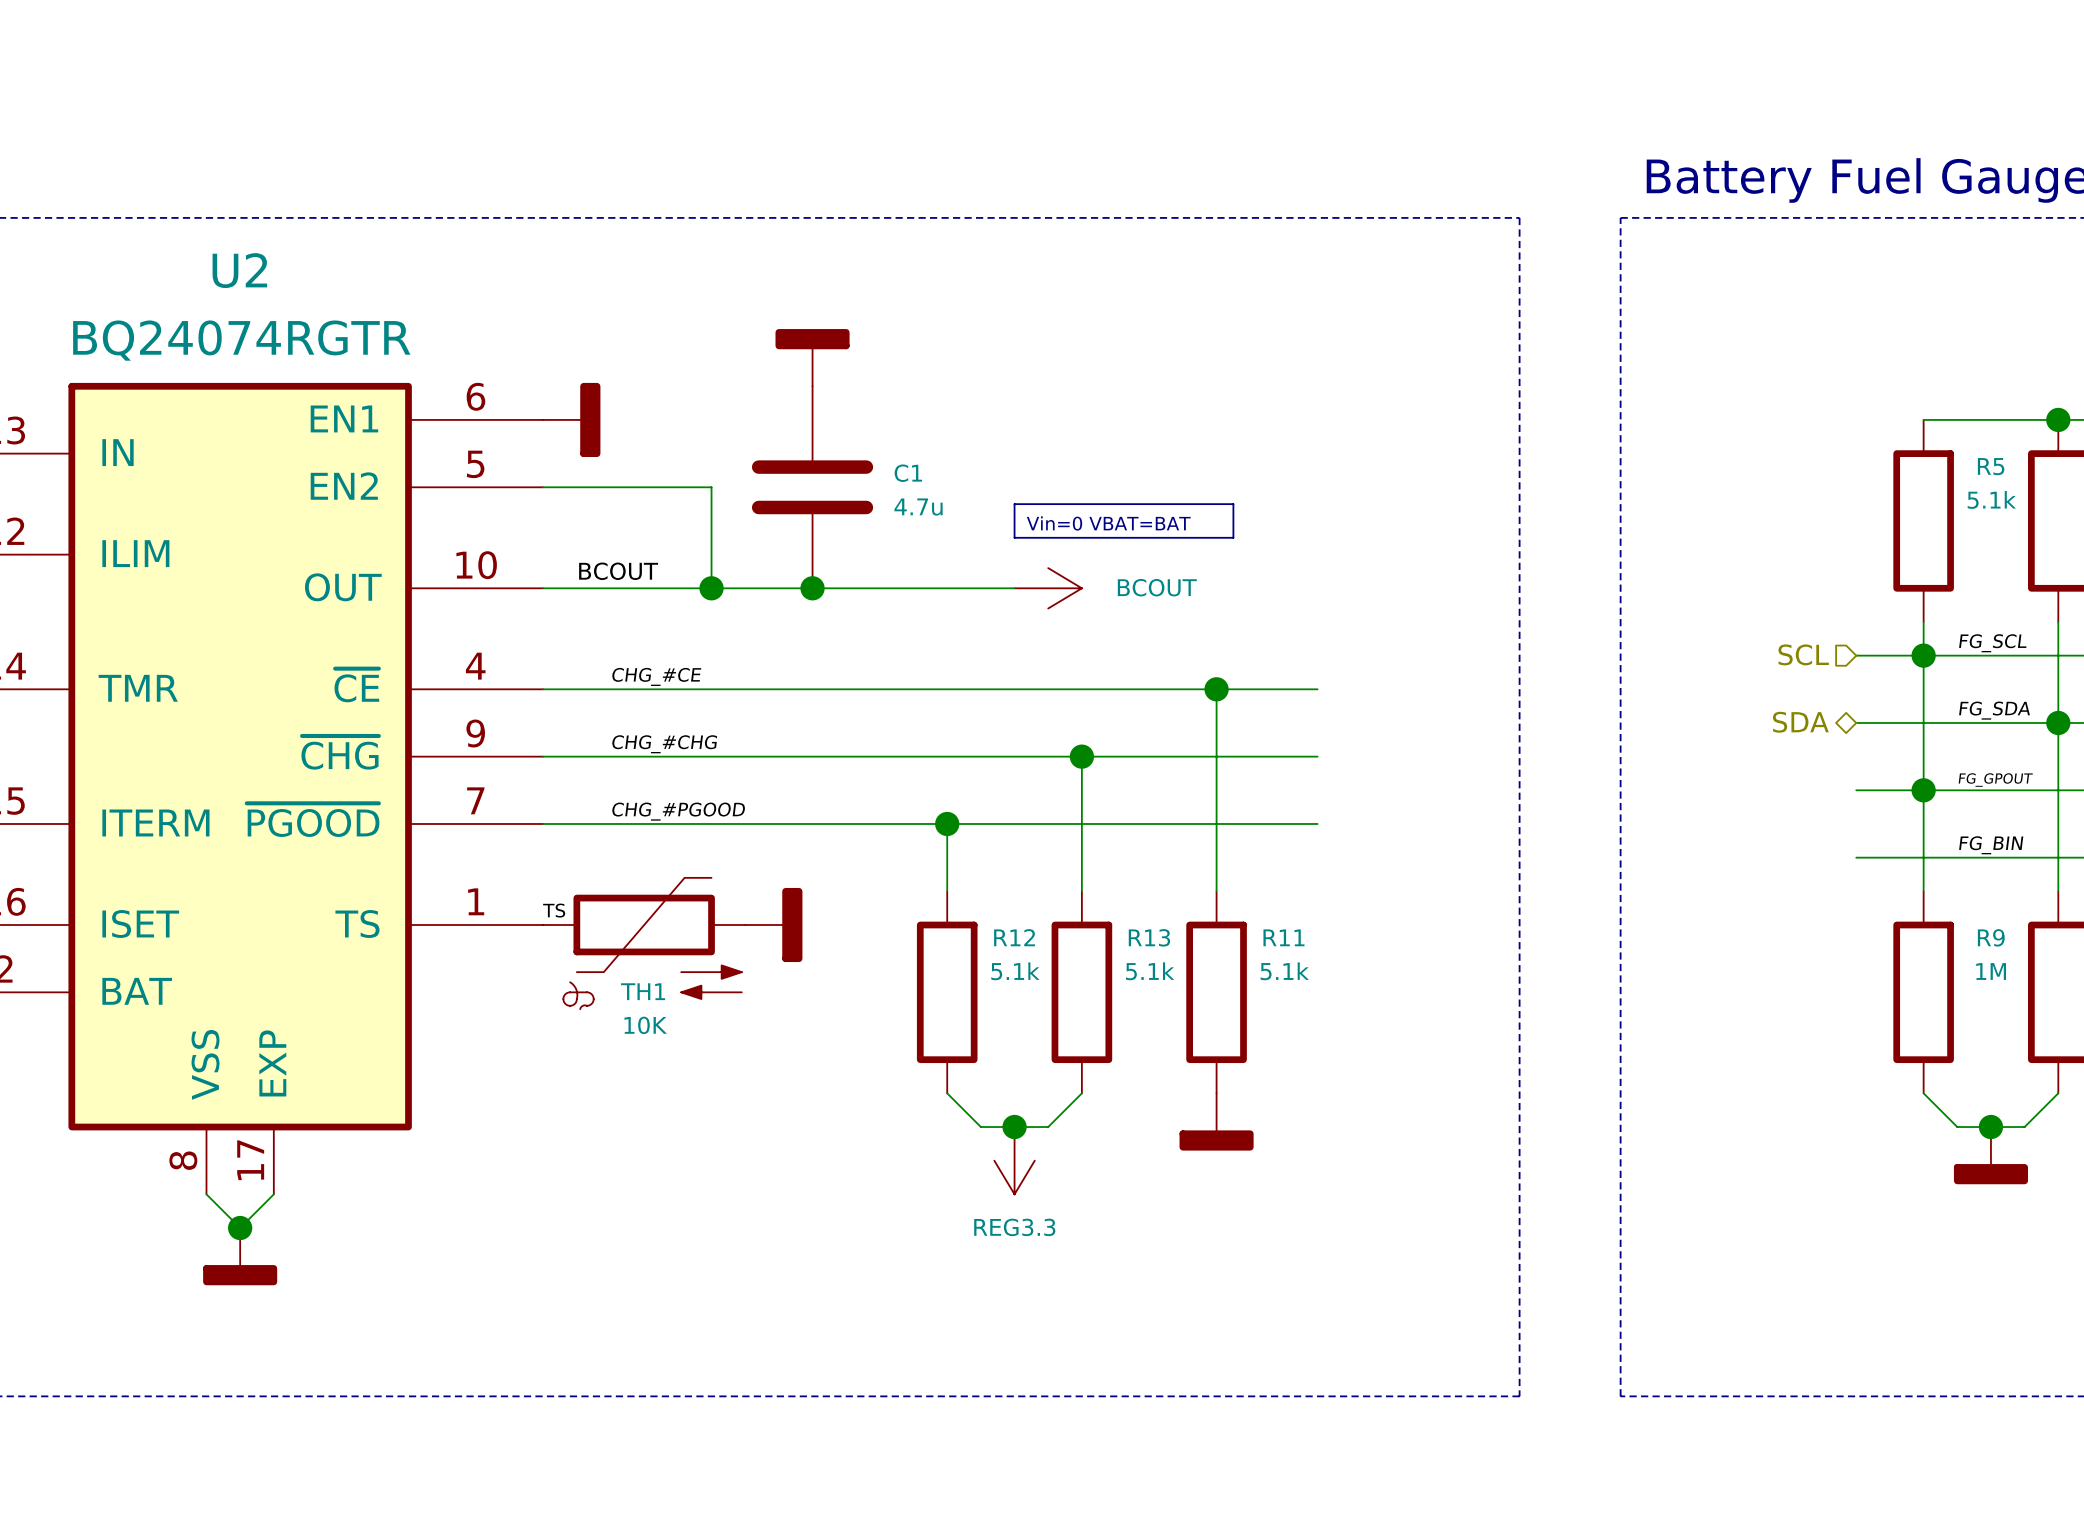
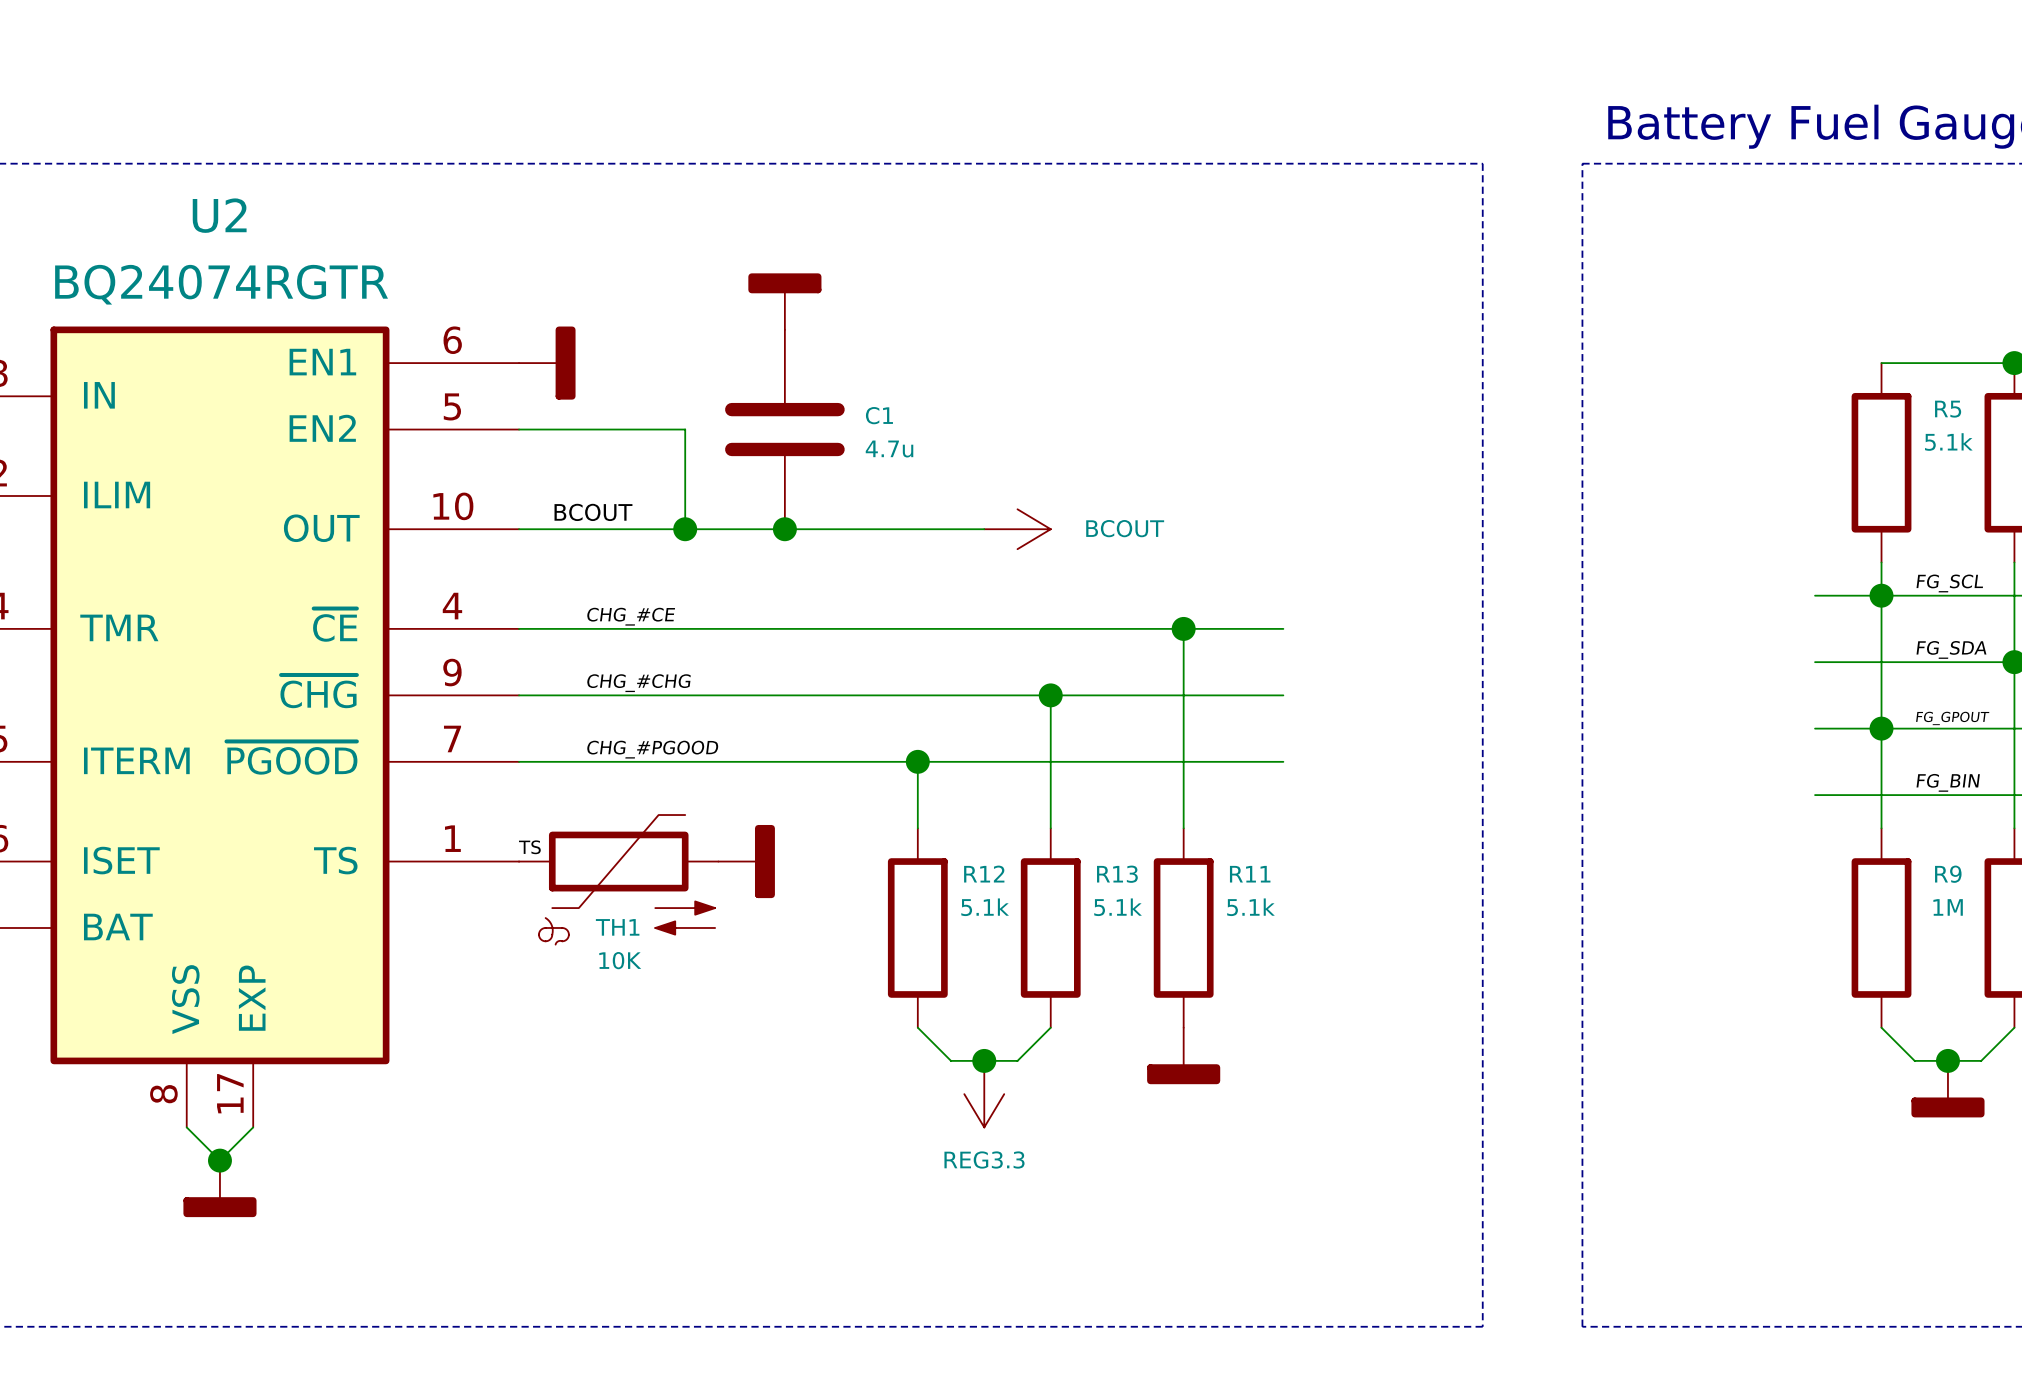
line: (1014, 504) (1233, 504) (1233, 537) (1014, 537) (1014, 504) -> none
text: Vin=0 VBAT=BAT (1108, 523) -> none
hierarchical label: SCL (1803, 654) -> none
hierarchical label: SDA (1800, 722) -> none

